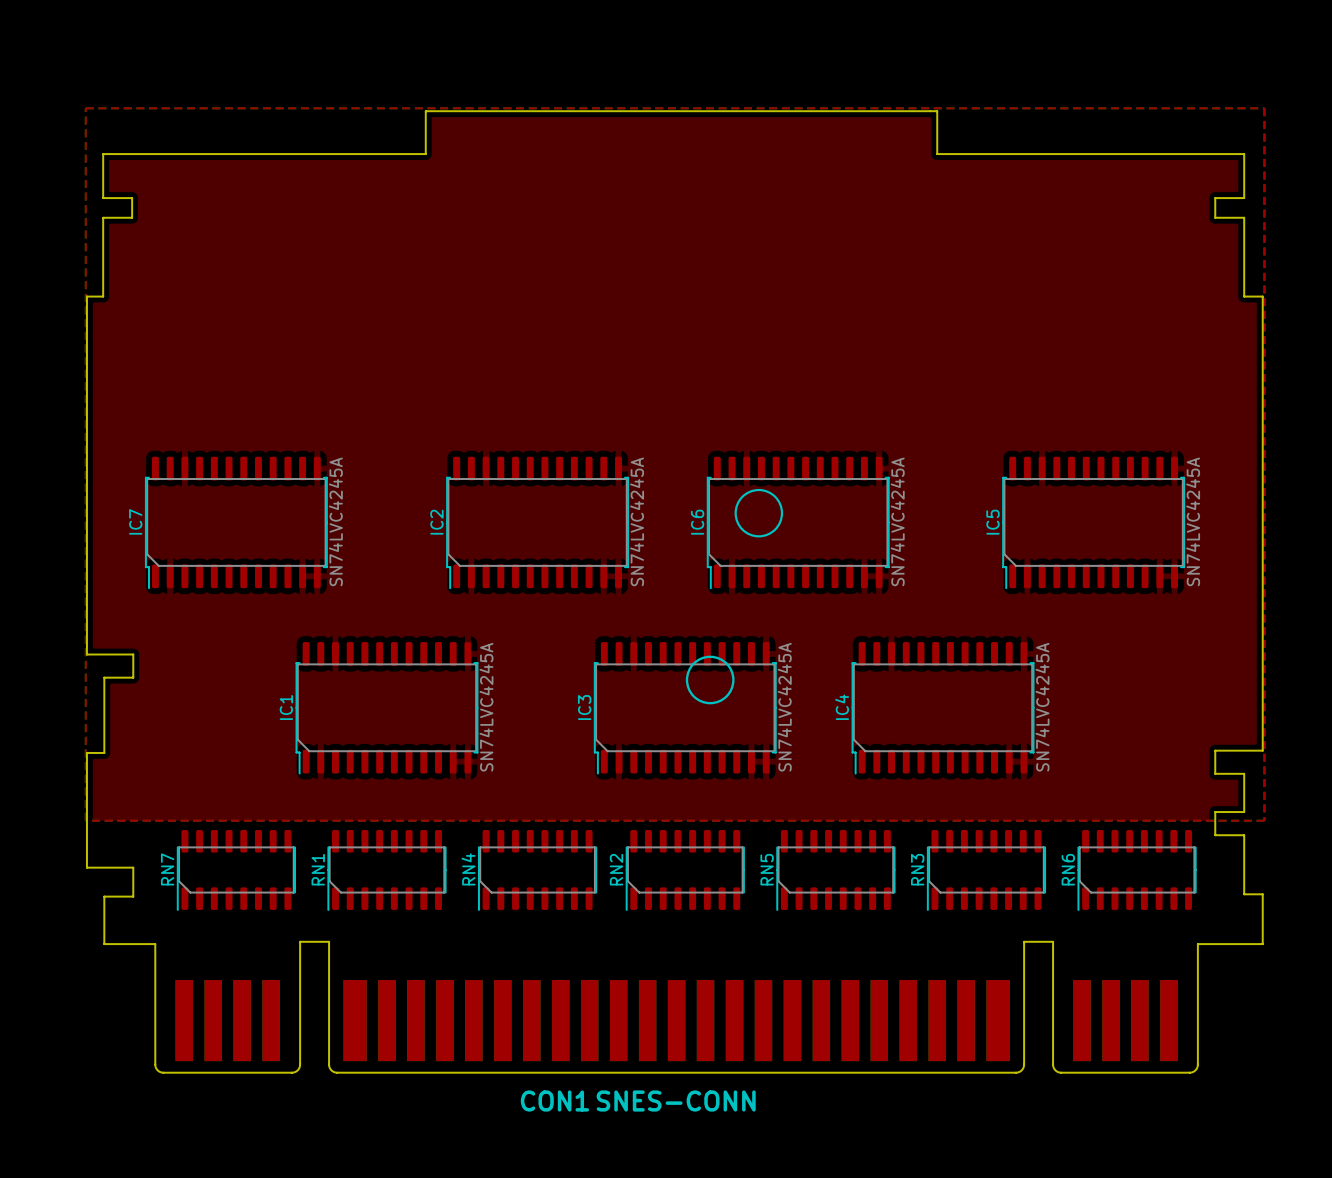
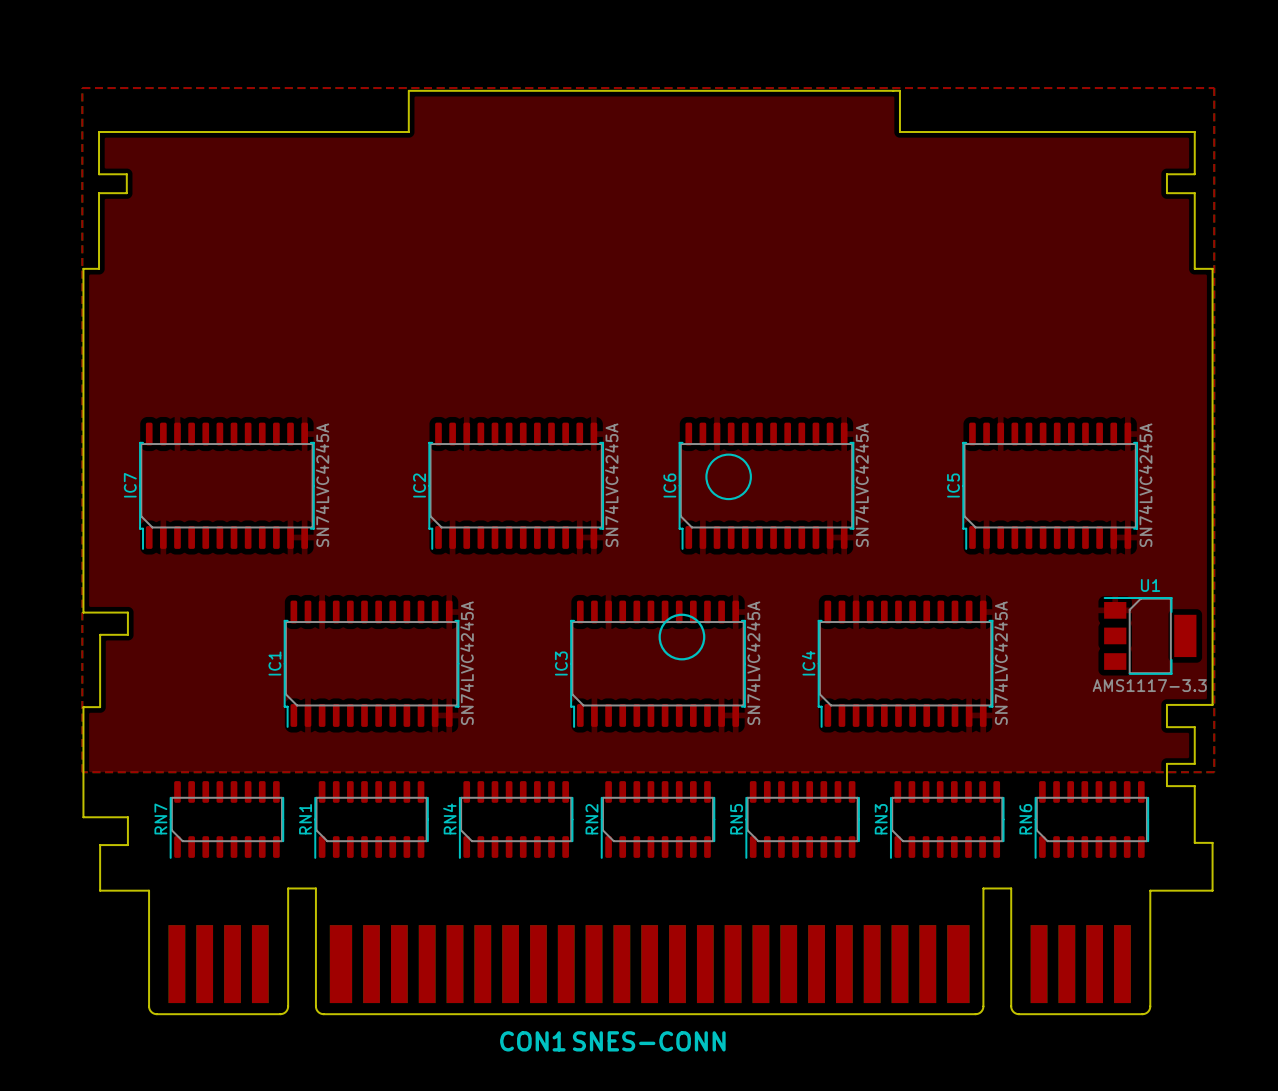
U1: none -> AMS1117-3.3 (1150, 635)

